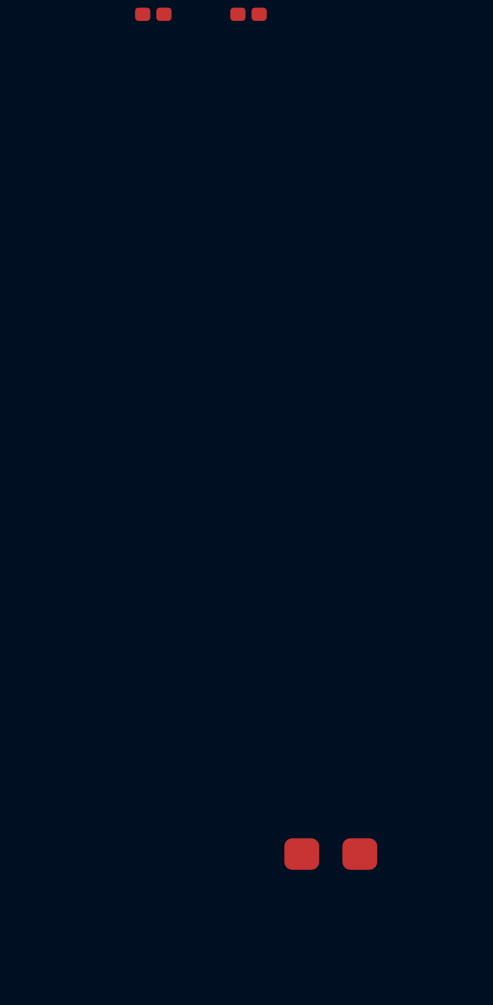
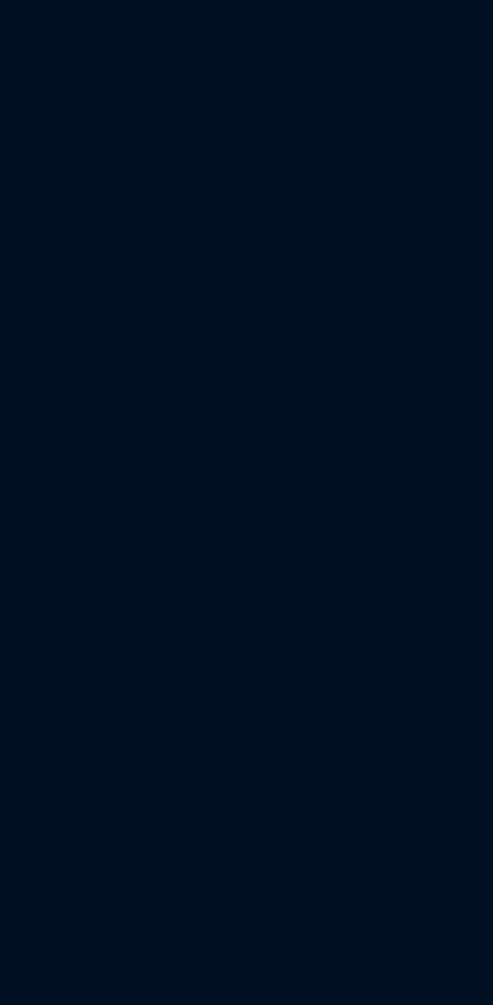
part: (153, 14) -> none
part: (248, 14) -> none
part: (330, 854) -> none

